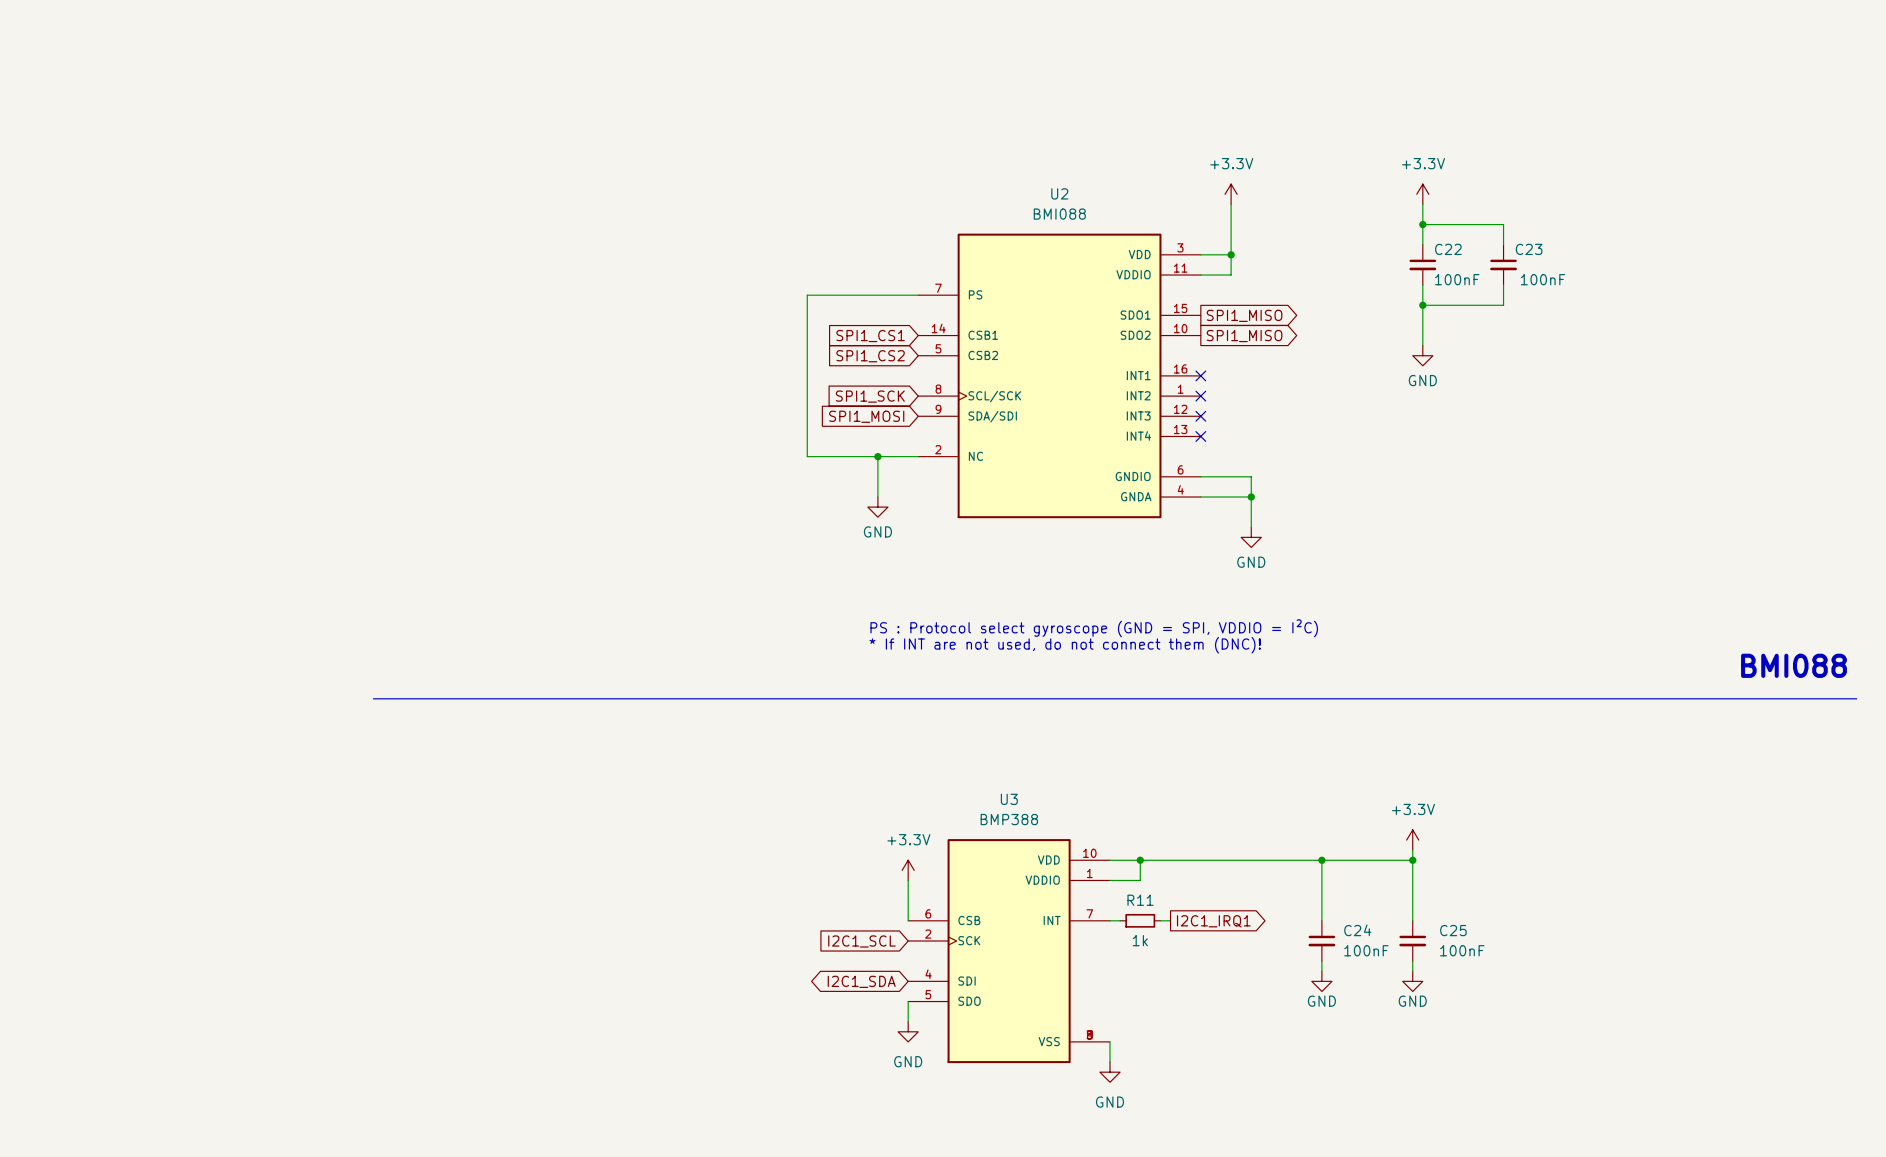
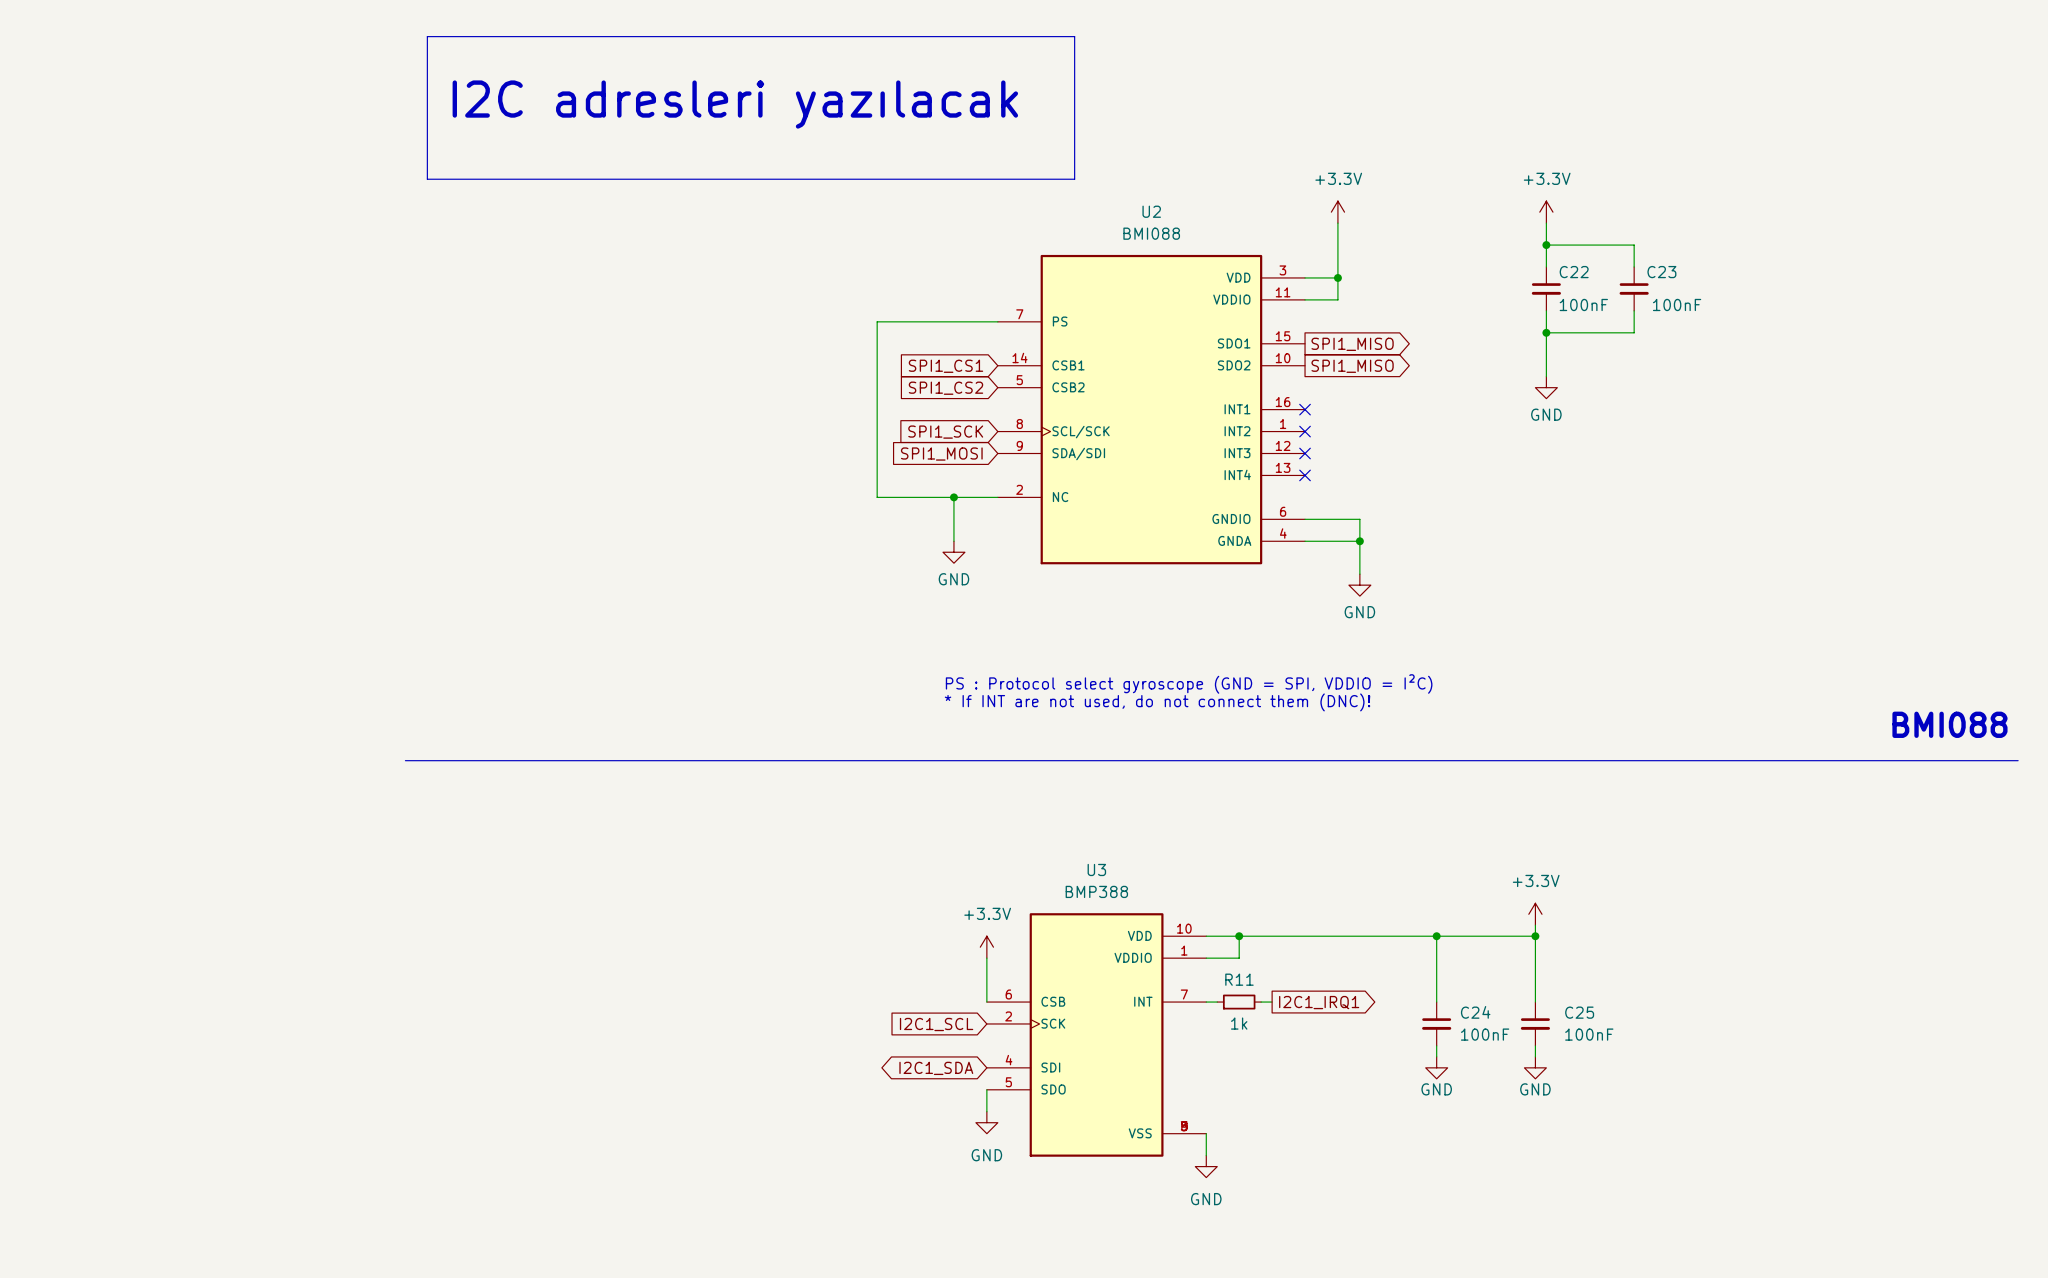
line: none -> (427, 36) (1074, 36) (1074, 179) (427, 179) (427, 36)
text: none -> I2C adresleri yazılacak (735, 104)

